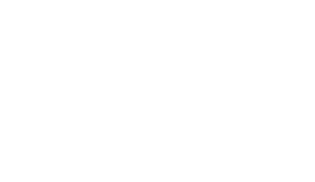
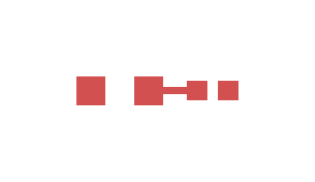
part: none -> (119, 90)
top track: none -> (197, 90) (149, 90)
part: none -> (212, 90)

